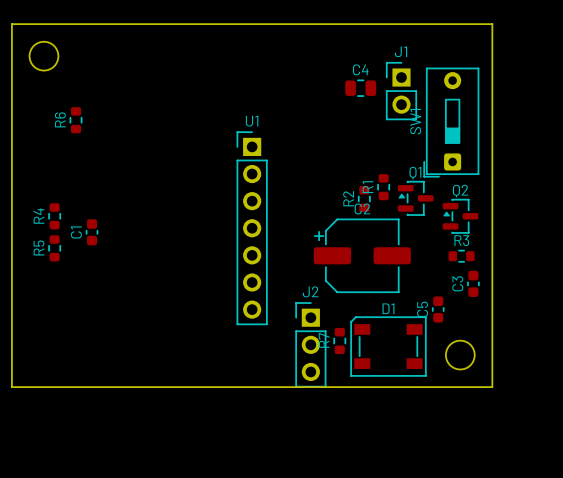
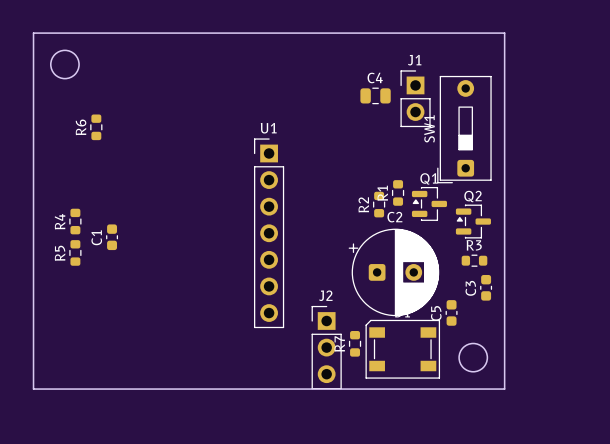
C2 footprint: [313, 218, 411, 293] -> [348, 228, 440, 317]

